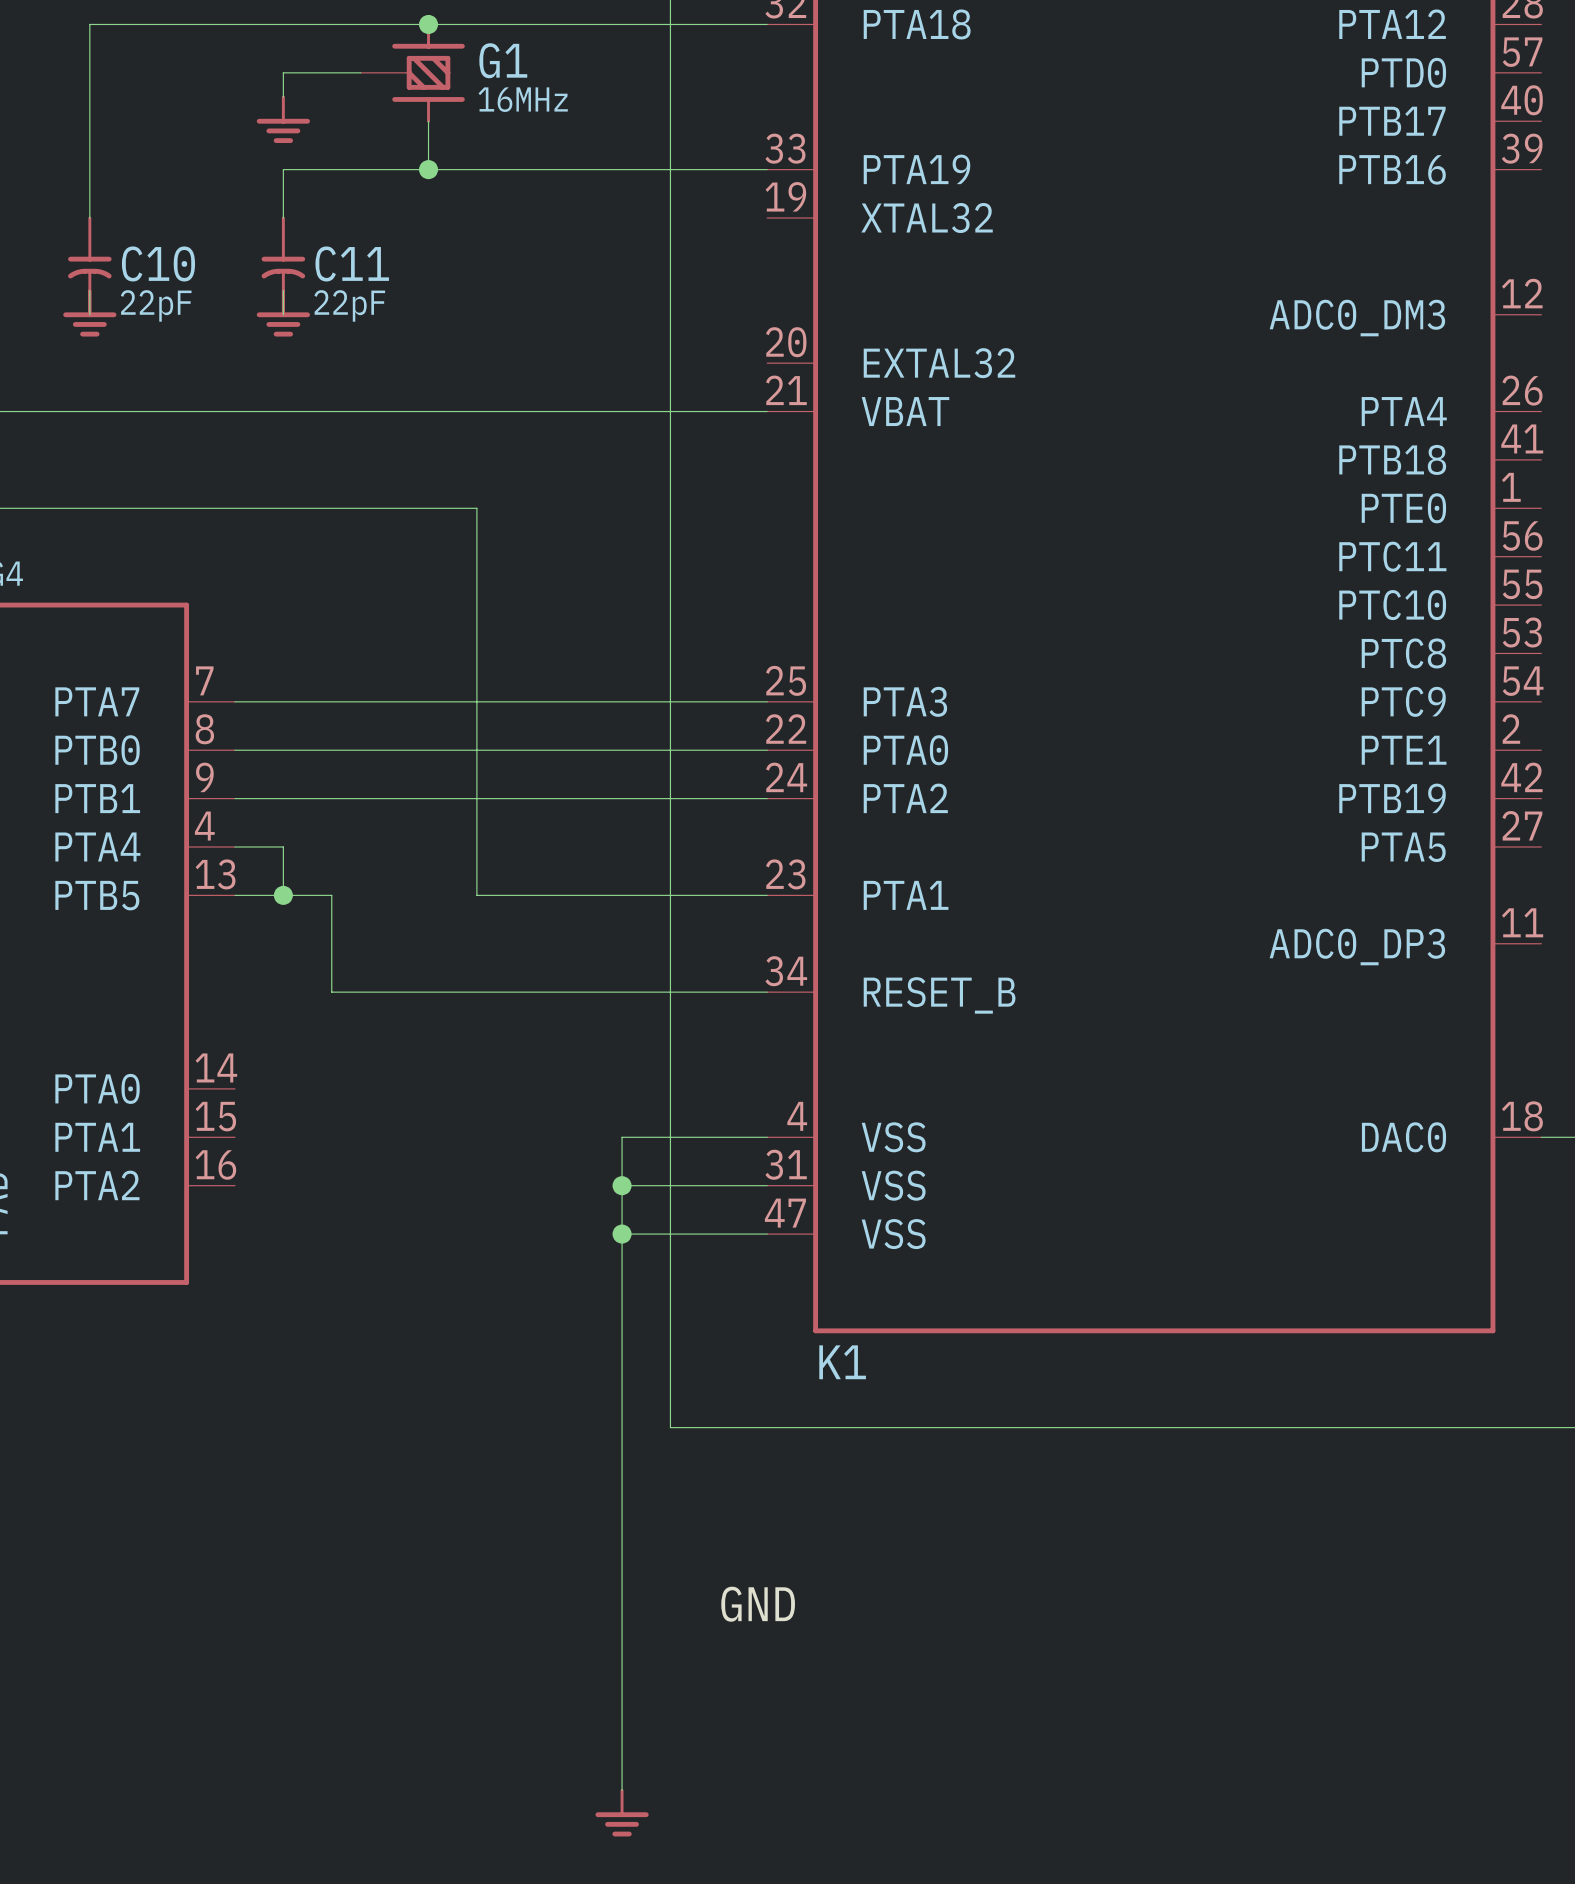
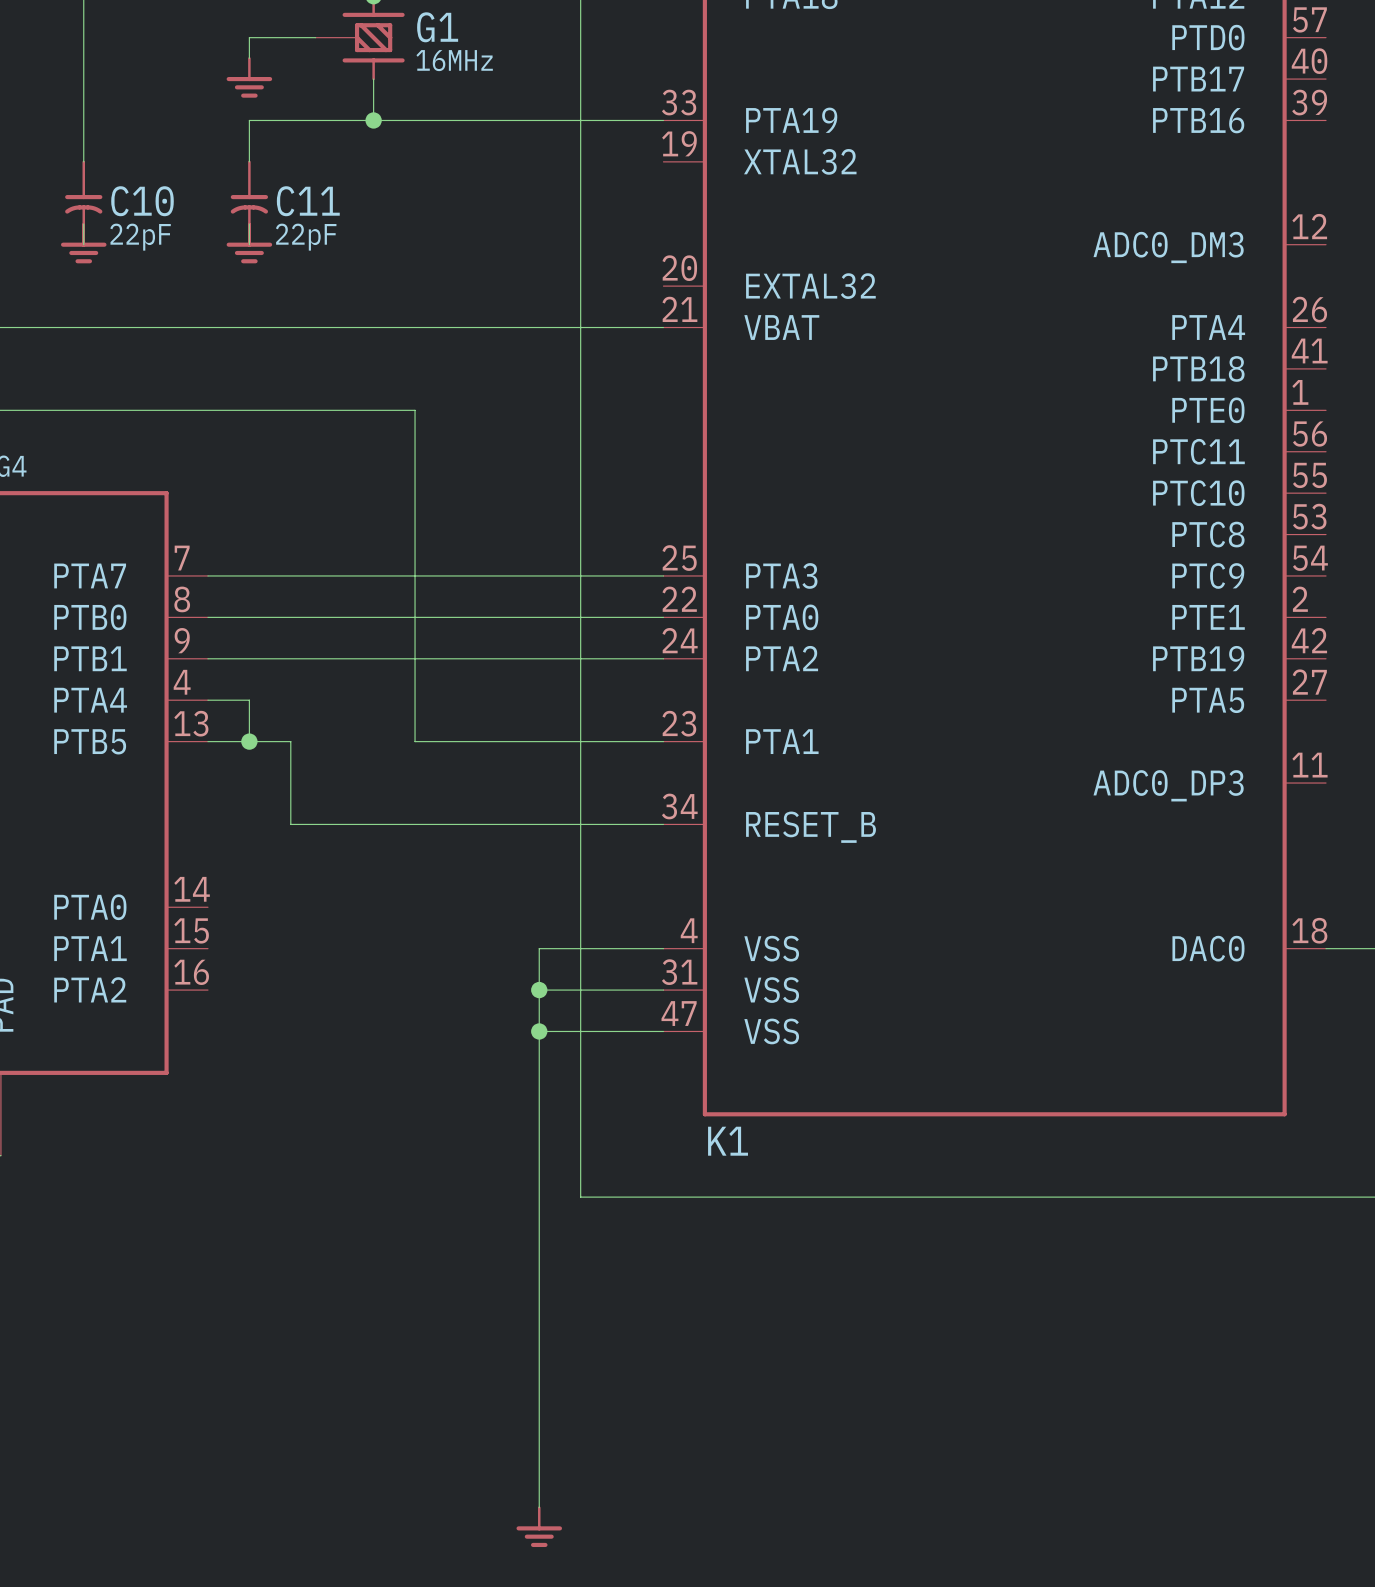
label: GND (758, 1604) -> none

